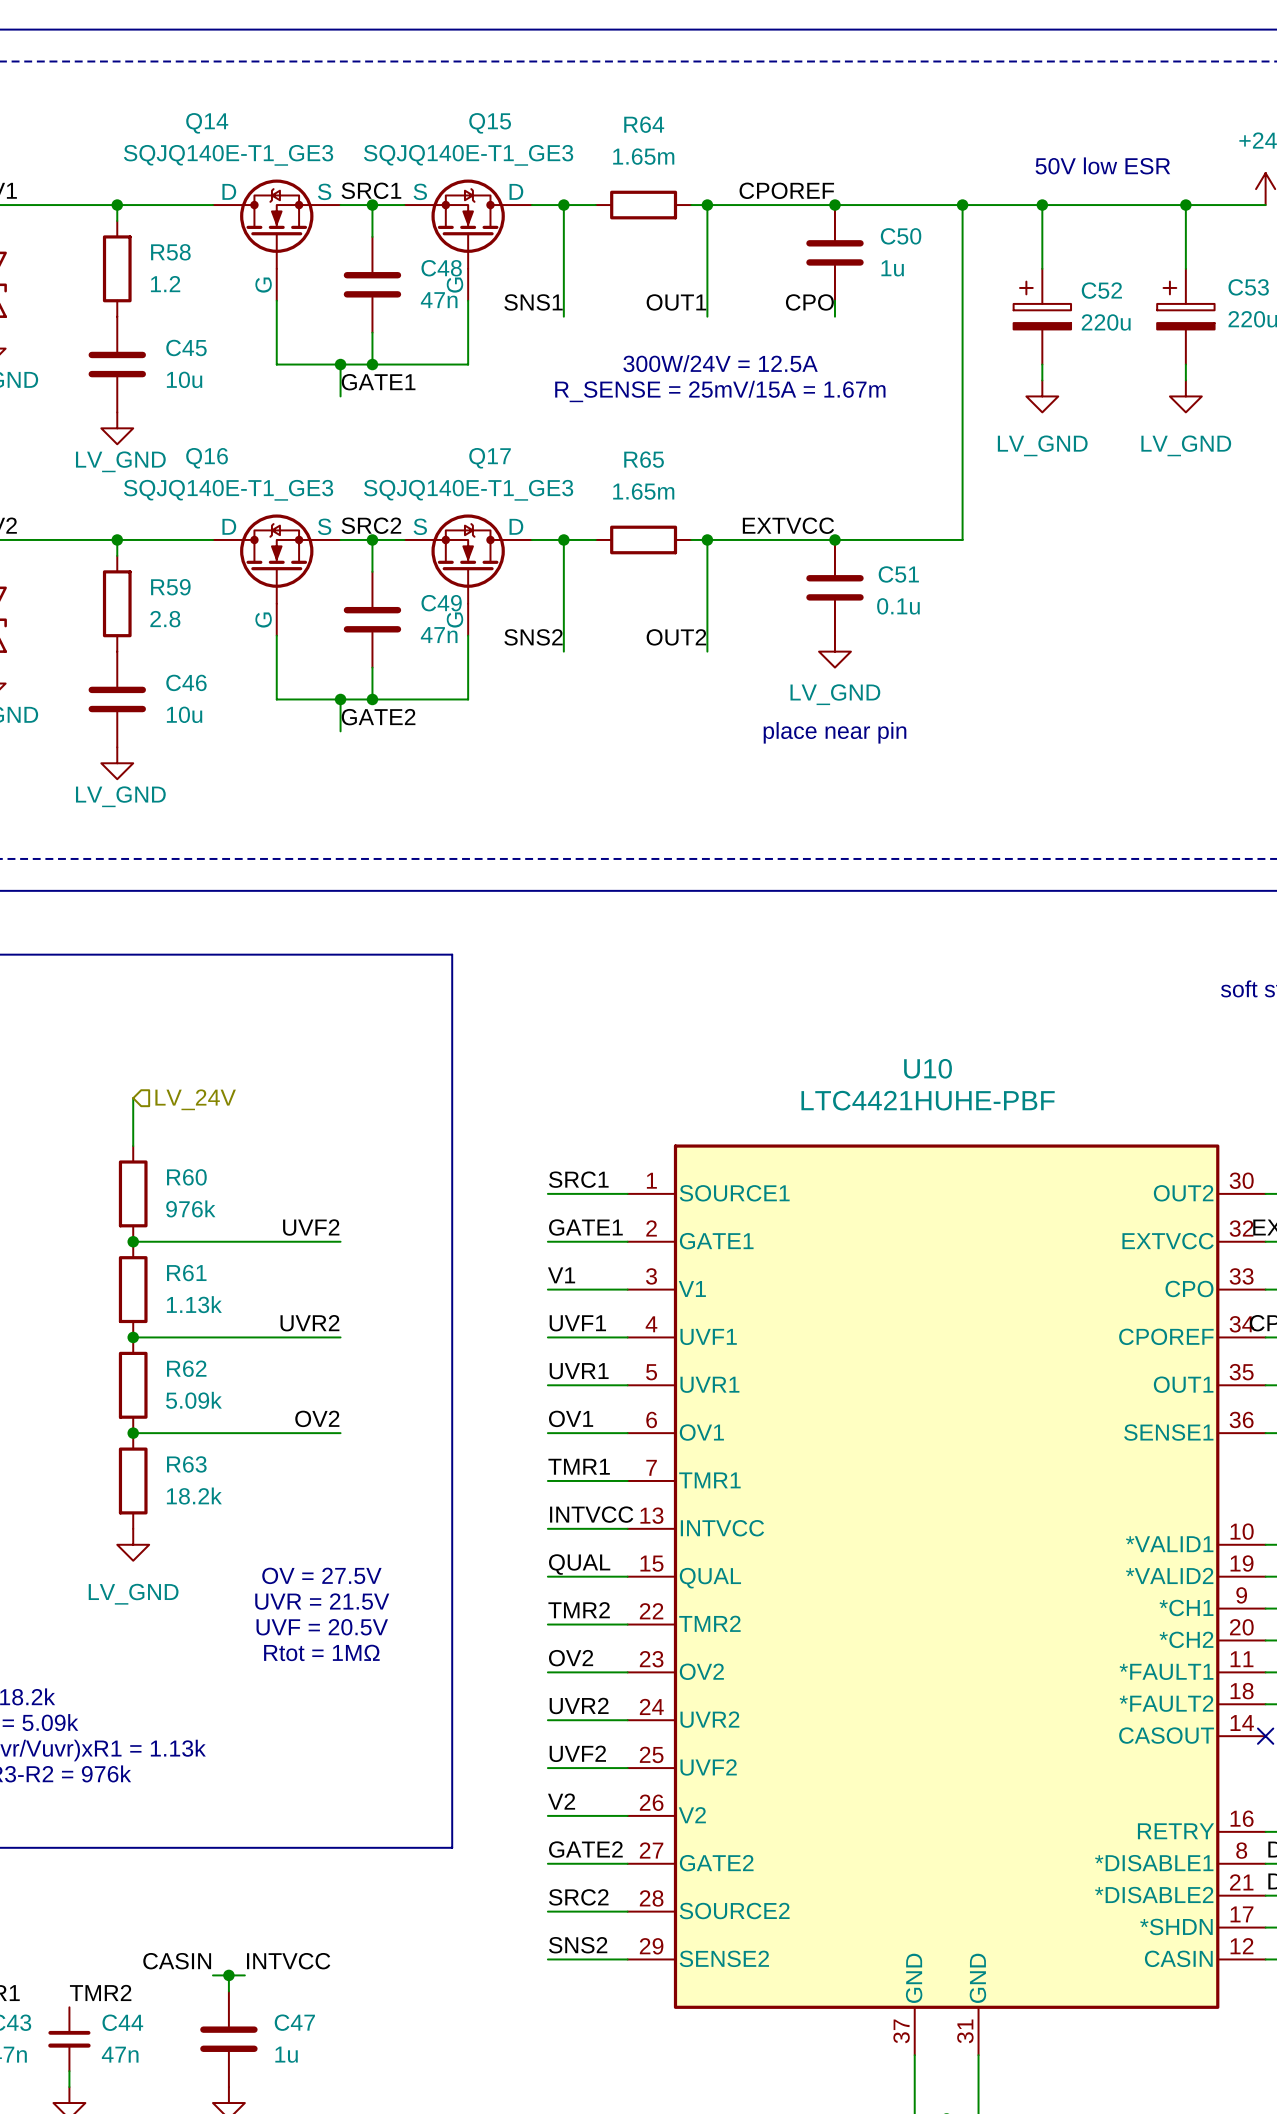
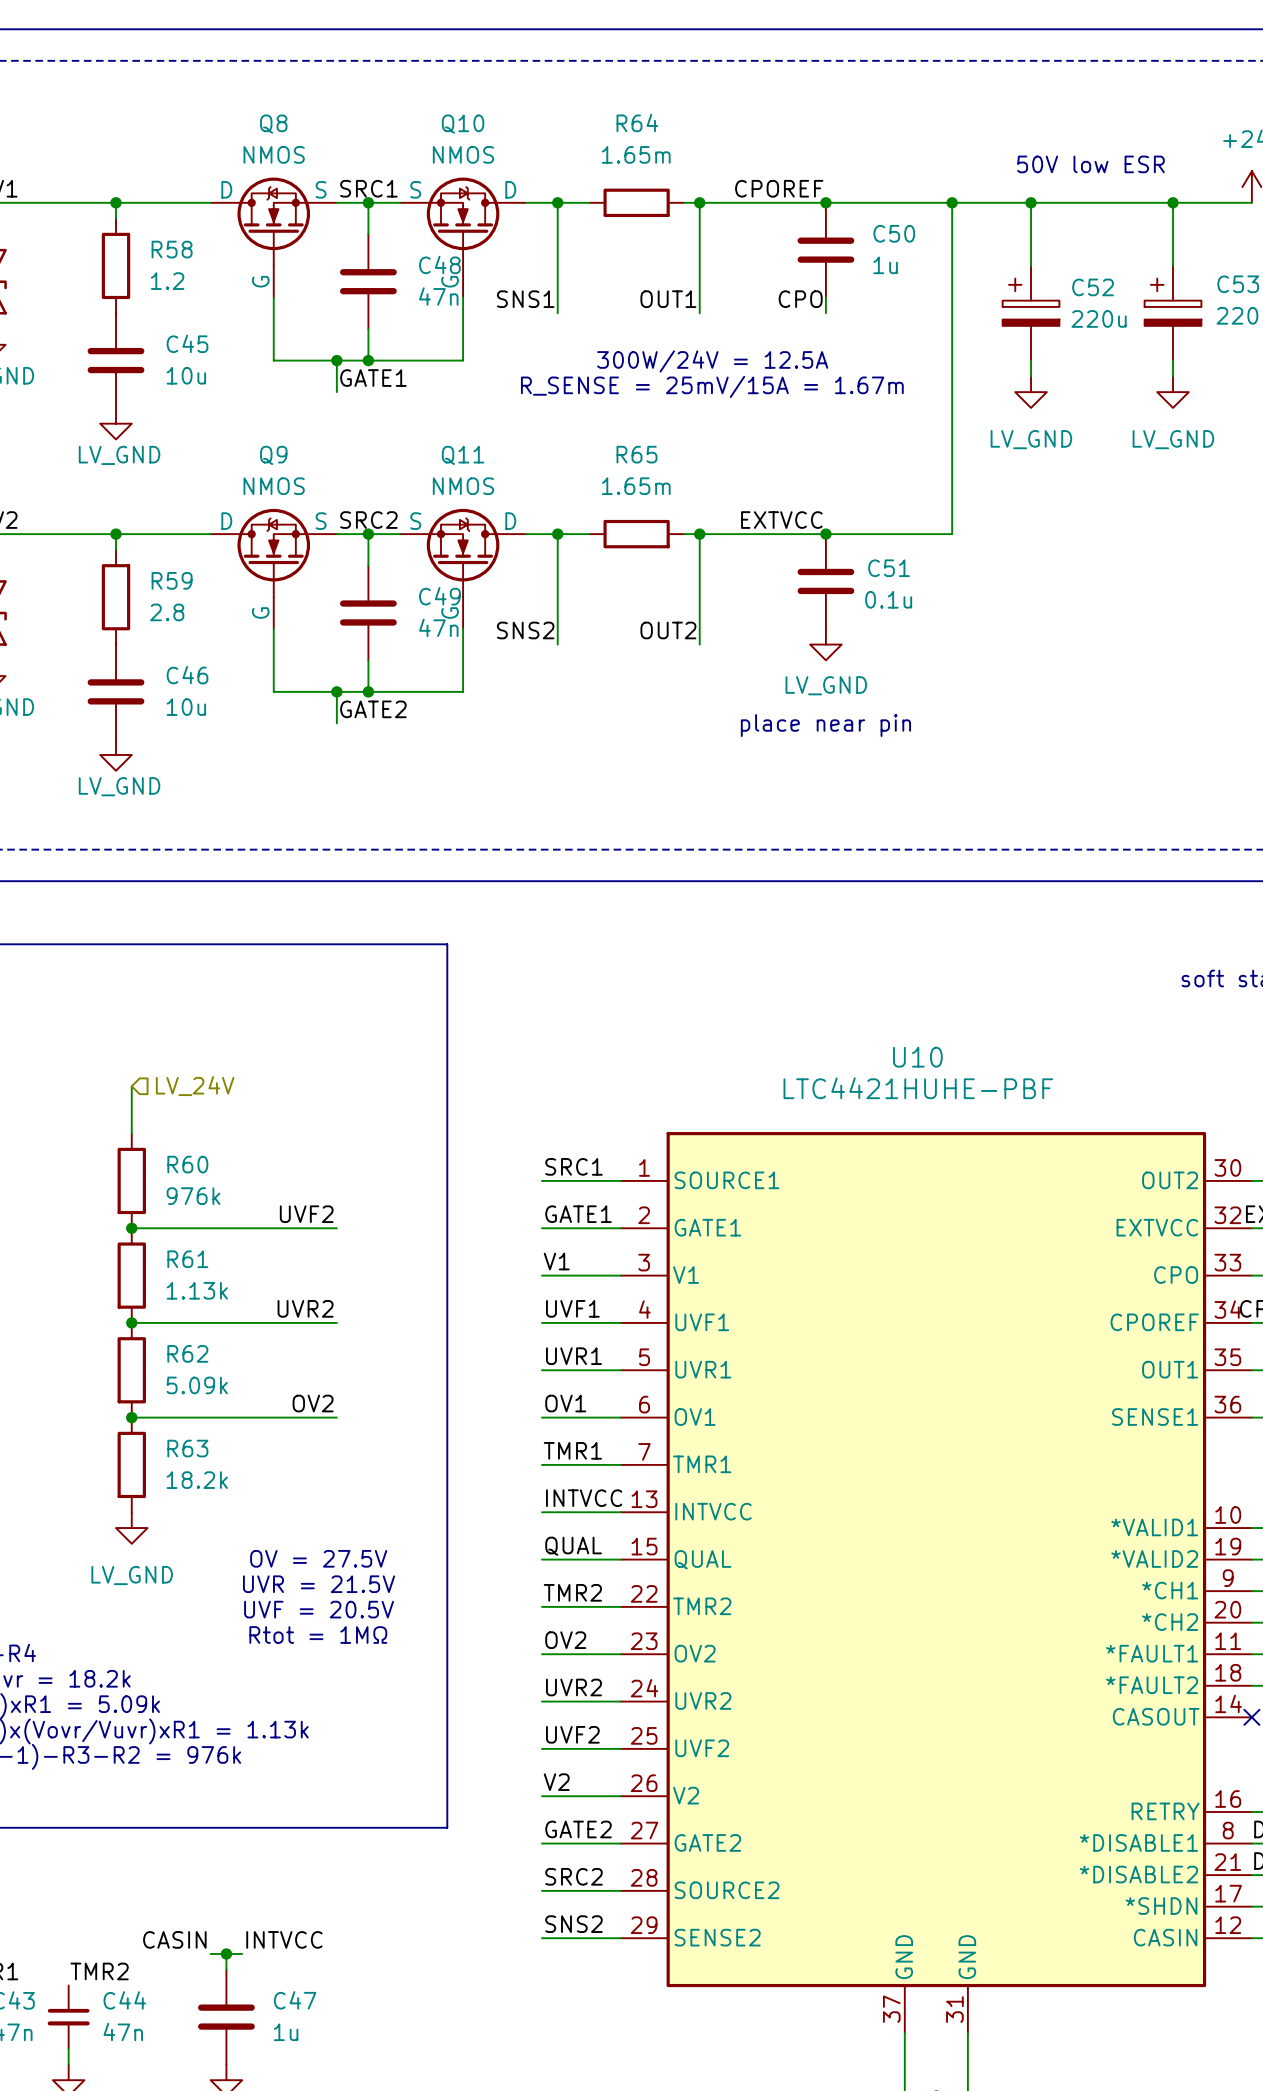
Q14 name: Q14 (207, 123) -> Q8 (273, 124)
Q15 name: Q15 (490, 123) -> Q10 (463, 124)
Q14 value: SQJQ140E-T1_GE3 (228, 155) -> NMOS (274, 154)
Q15 value: SQJQ140E-T1_GE3 (468, 155) -> NMOS (463, 154)
Q16 name: Q16 (207, 458) -> Q9 (273, 455)
Q17 name: Q17 (490, 458) -> Q11 (463, 455)
Q16 value: SQJQ140E-T1_GE3 (228, 490) -> NMOS (274, 486)
Q17 value: SQJQ140E-T1_GE3 (468, 490) -> NMOS (463, 486)

